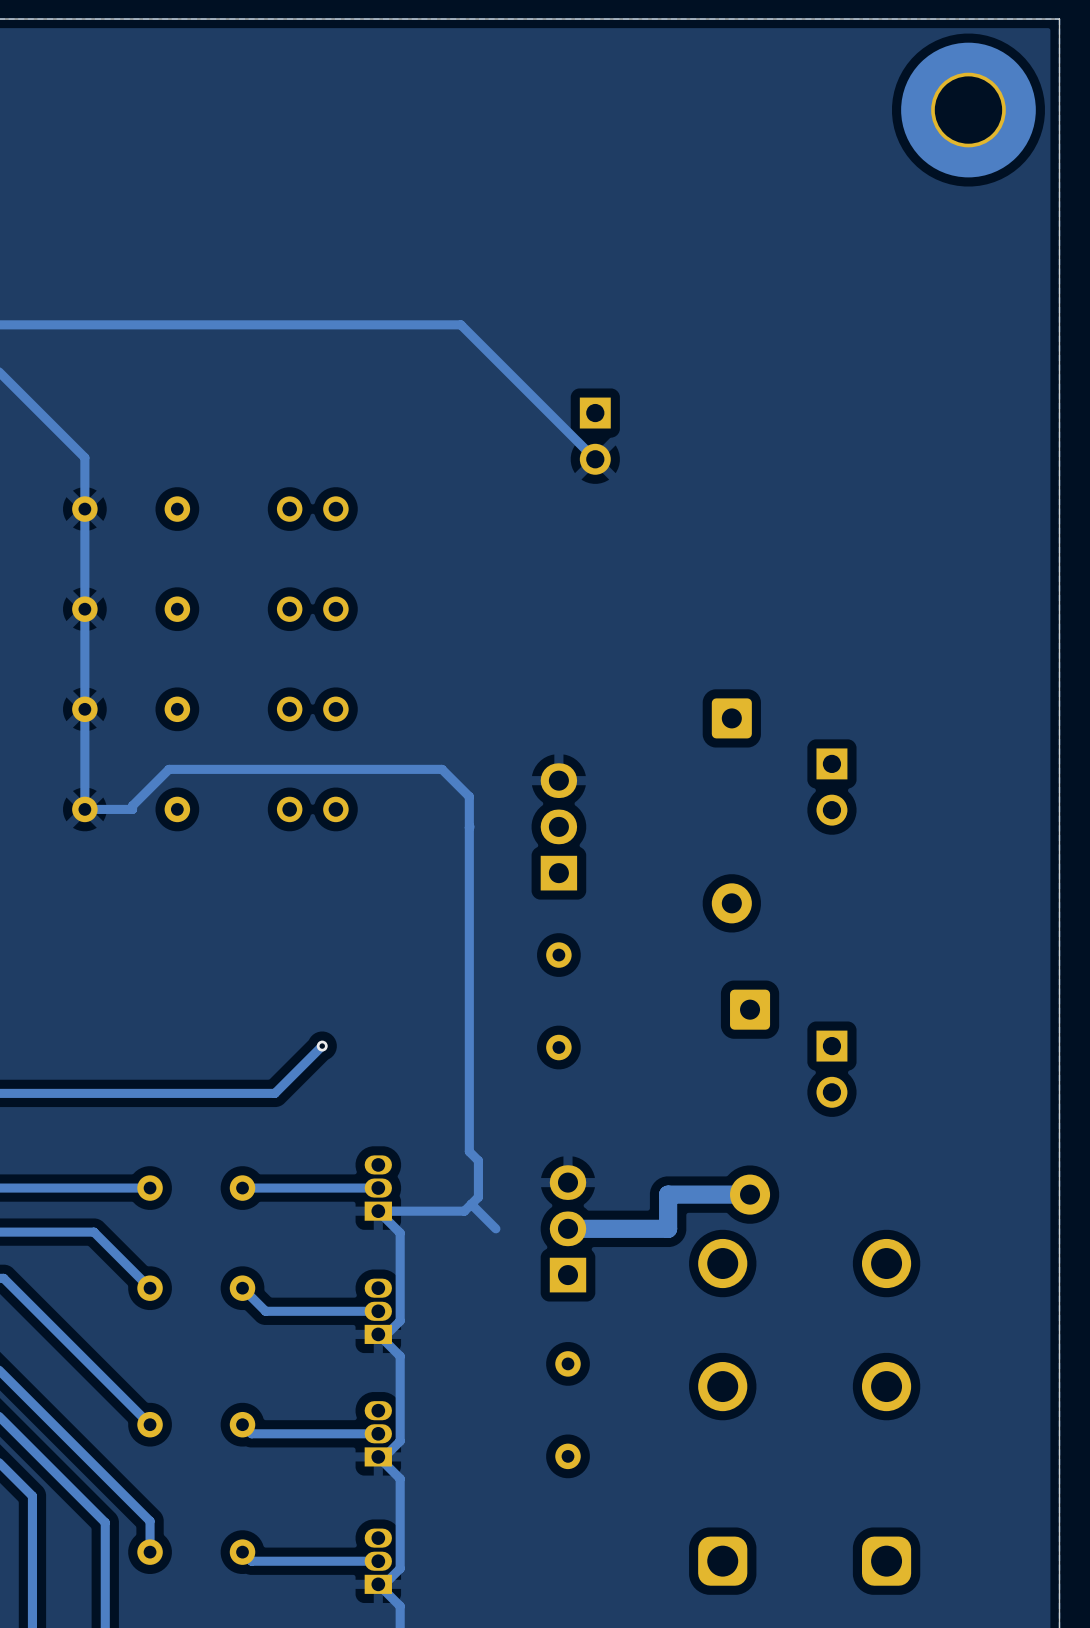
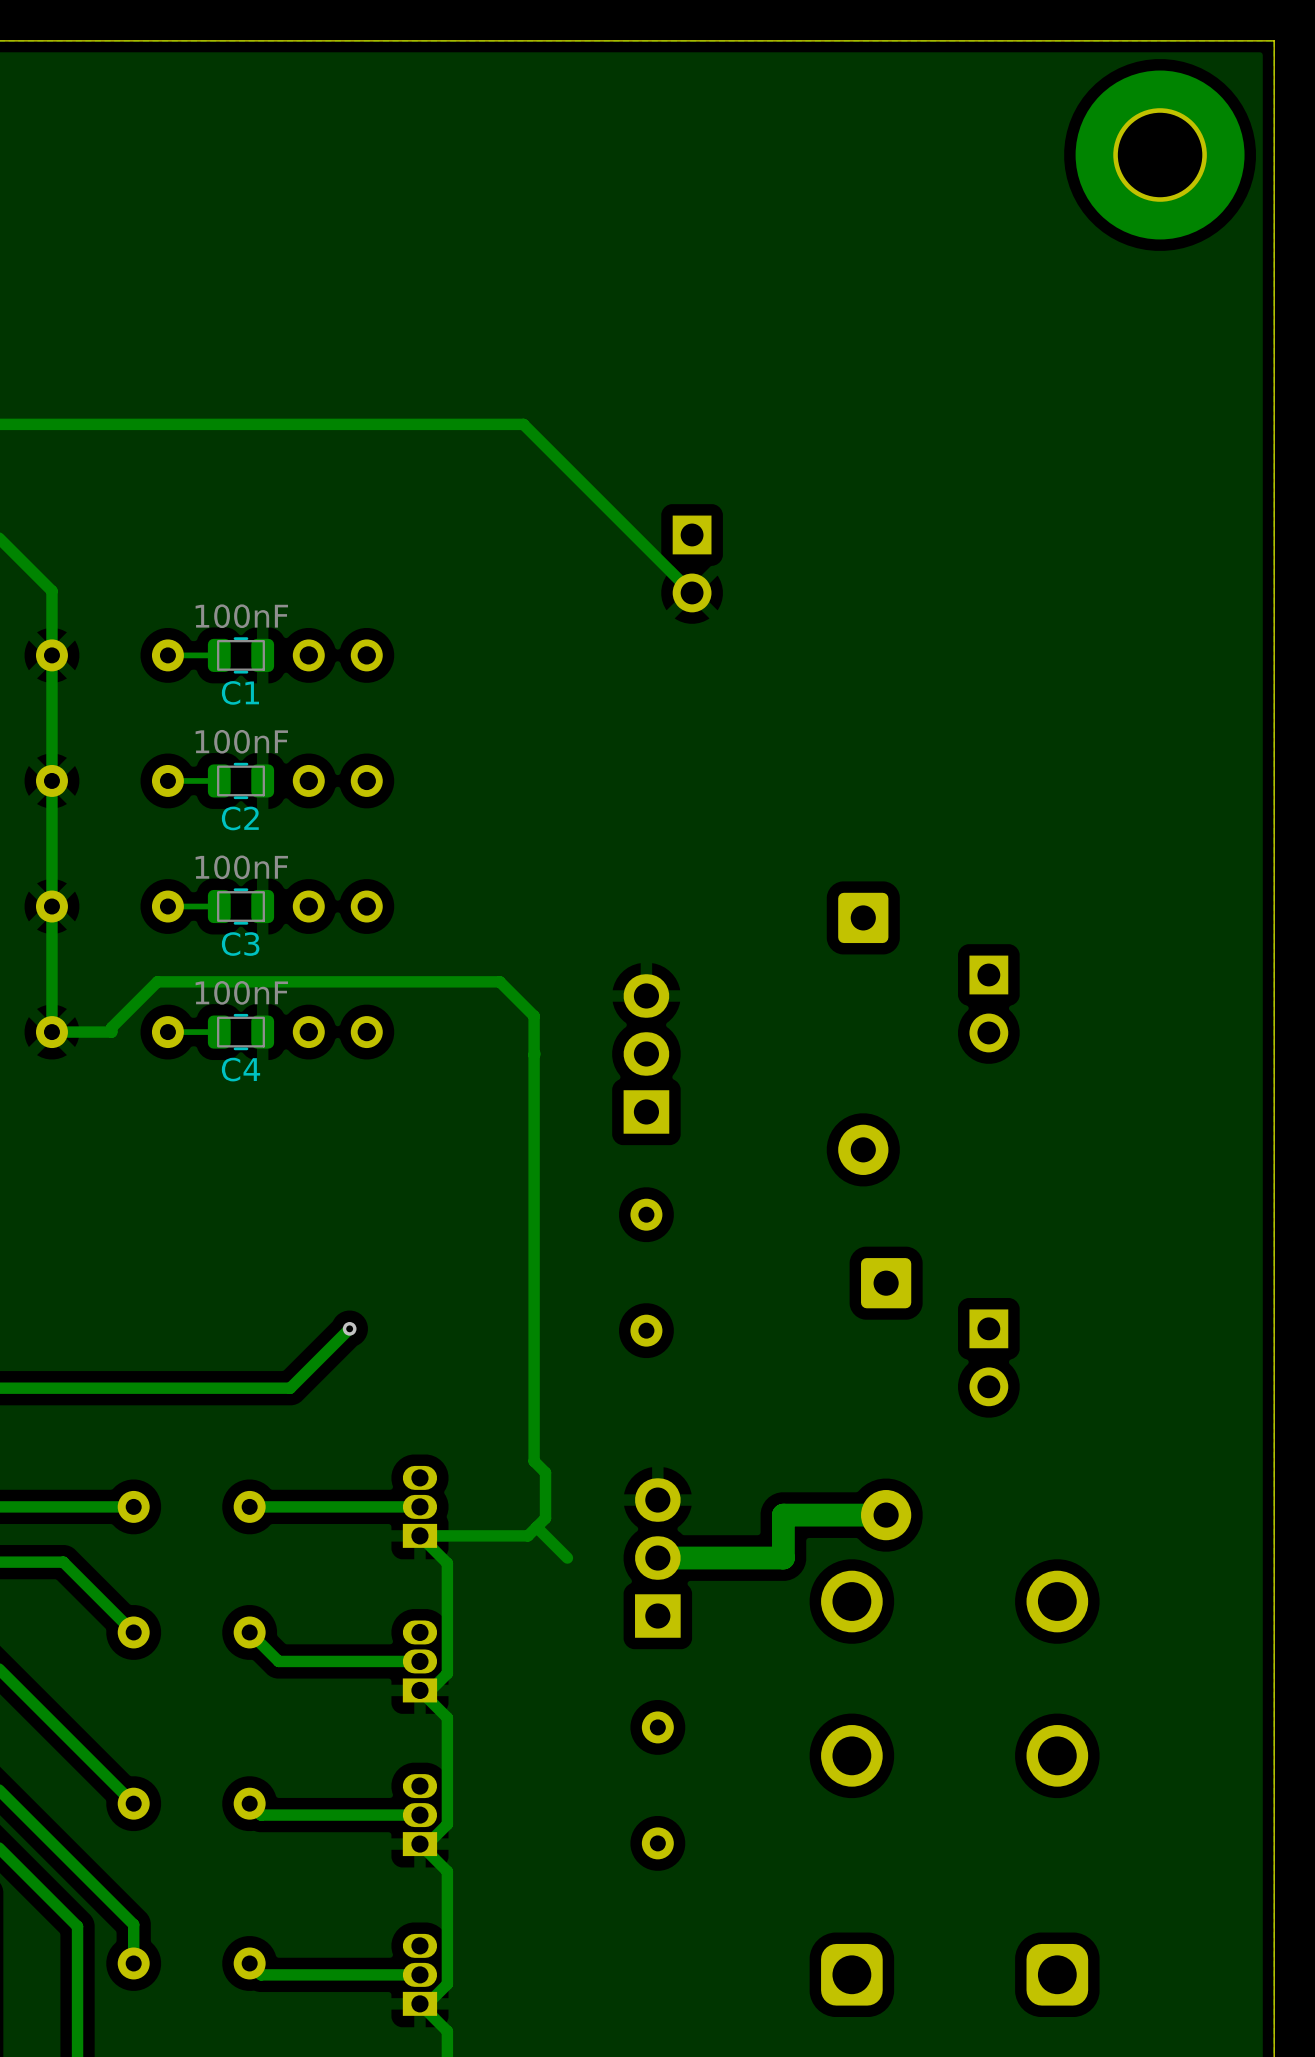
track: none -> (219, 655) (167, 655)
C1: none -> 100nF (240, 655)
track: none -> (219, 780) (167, 780)
C2: none -> 100nF (240, 780)
track: none -> (219, 906) (167, 906)
C3: none -> 100nF (240, 906)
track: none -> (219, 1032) (167, 1032)
C4: none -> 100nF (240, 1032)

